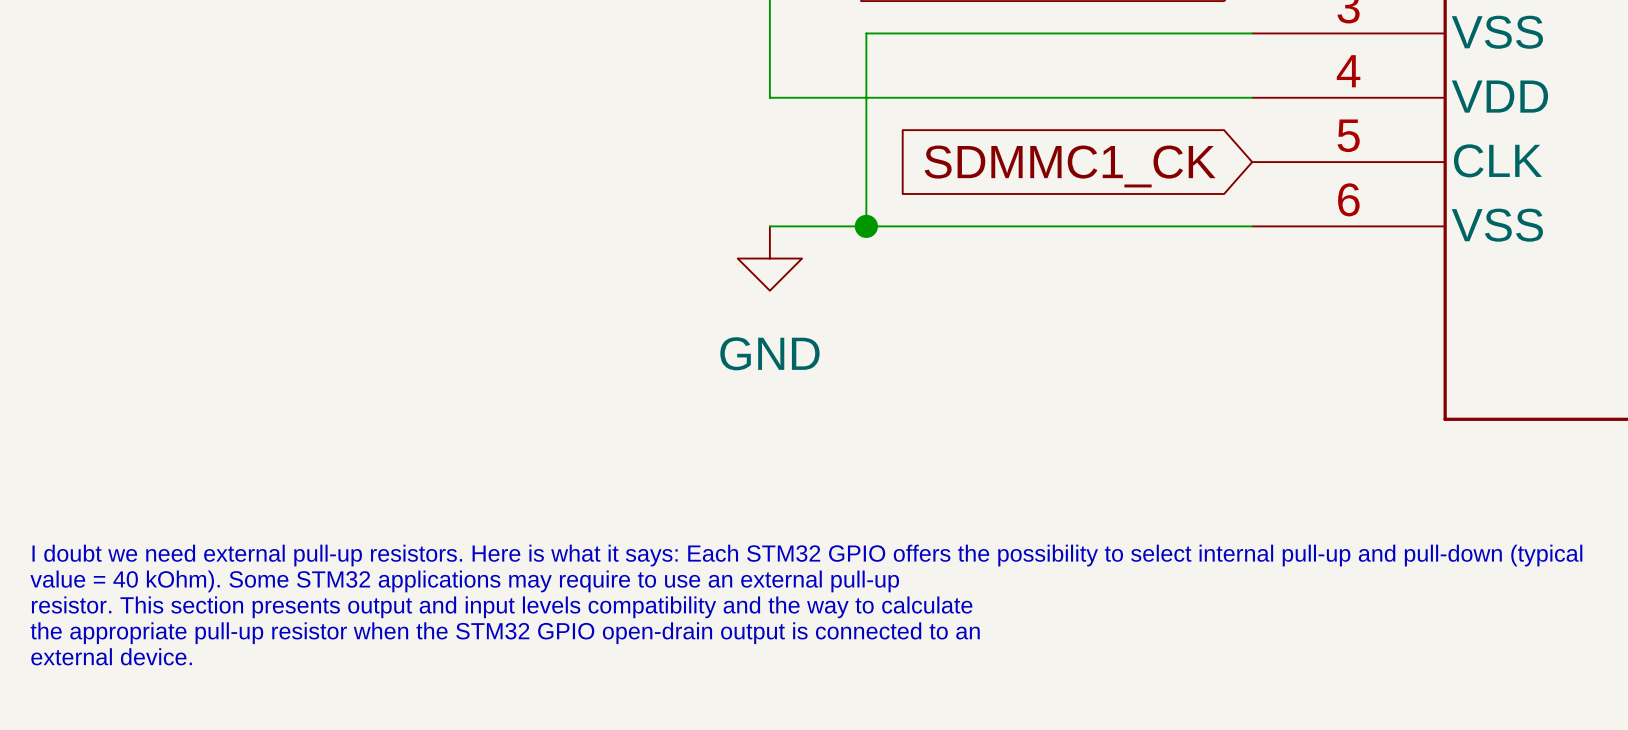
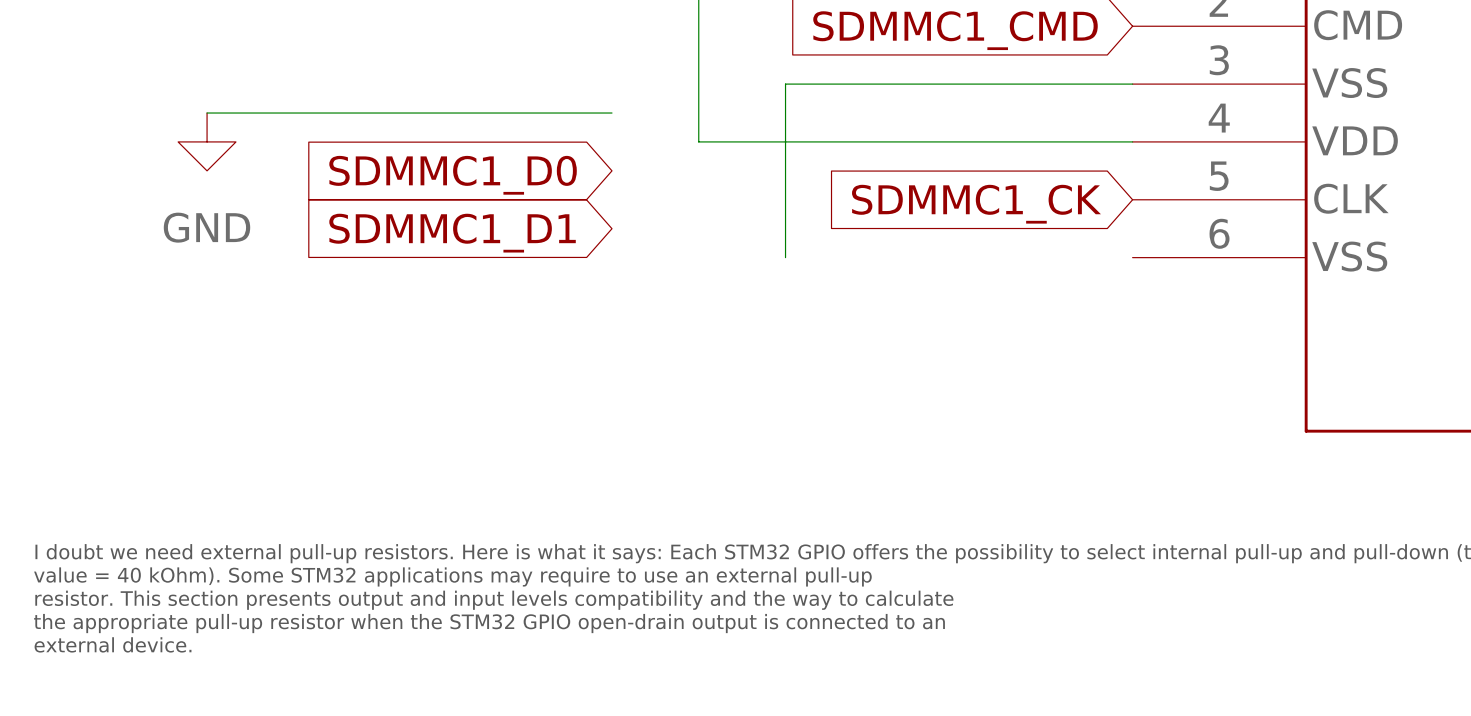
wire: none -> (207, 113) (611, 113)
power symbol: none -> GND (207, 141)
global label: none -> SDMMC1_D0 (453, 175)
global label: none -> SDMMC1_D1 (452, 233)
wire: (769, 226) (1252, 226) -> none
junction: (866, 226) -> none
power symbol: GND (769, 258) -> none

